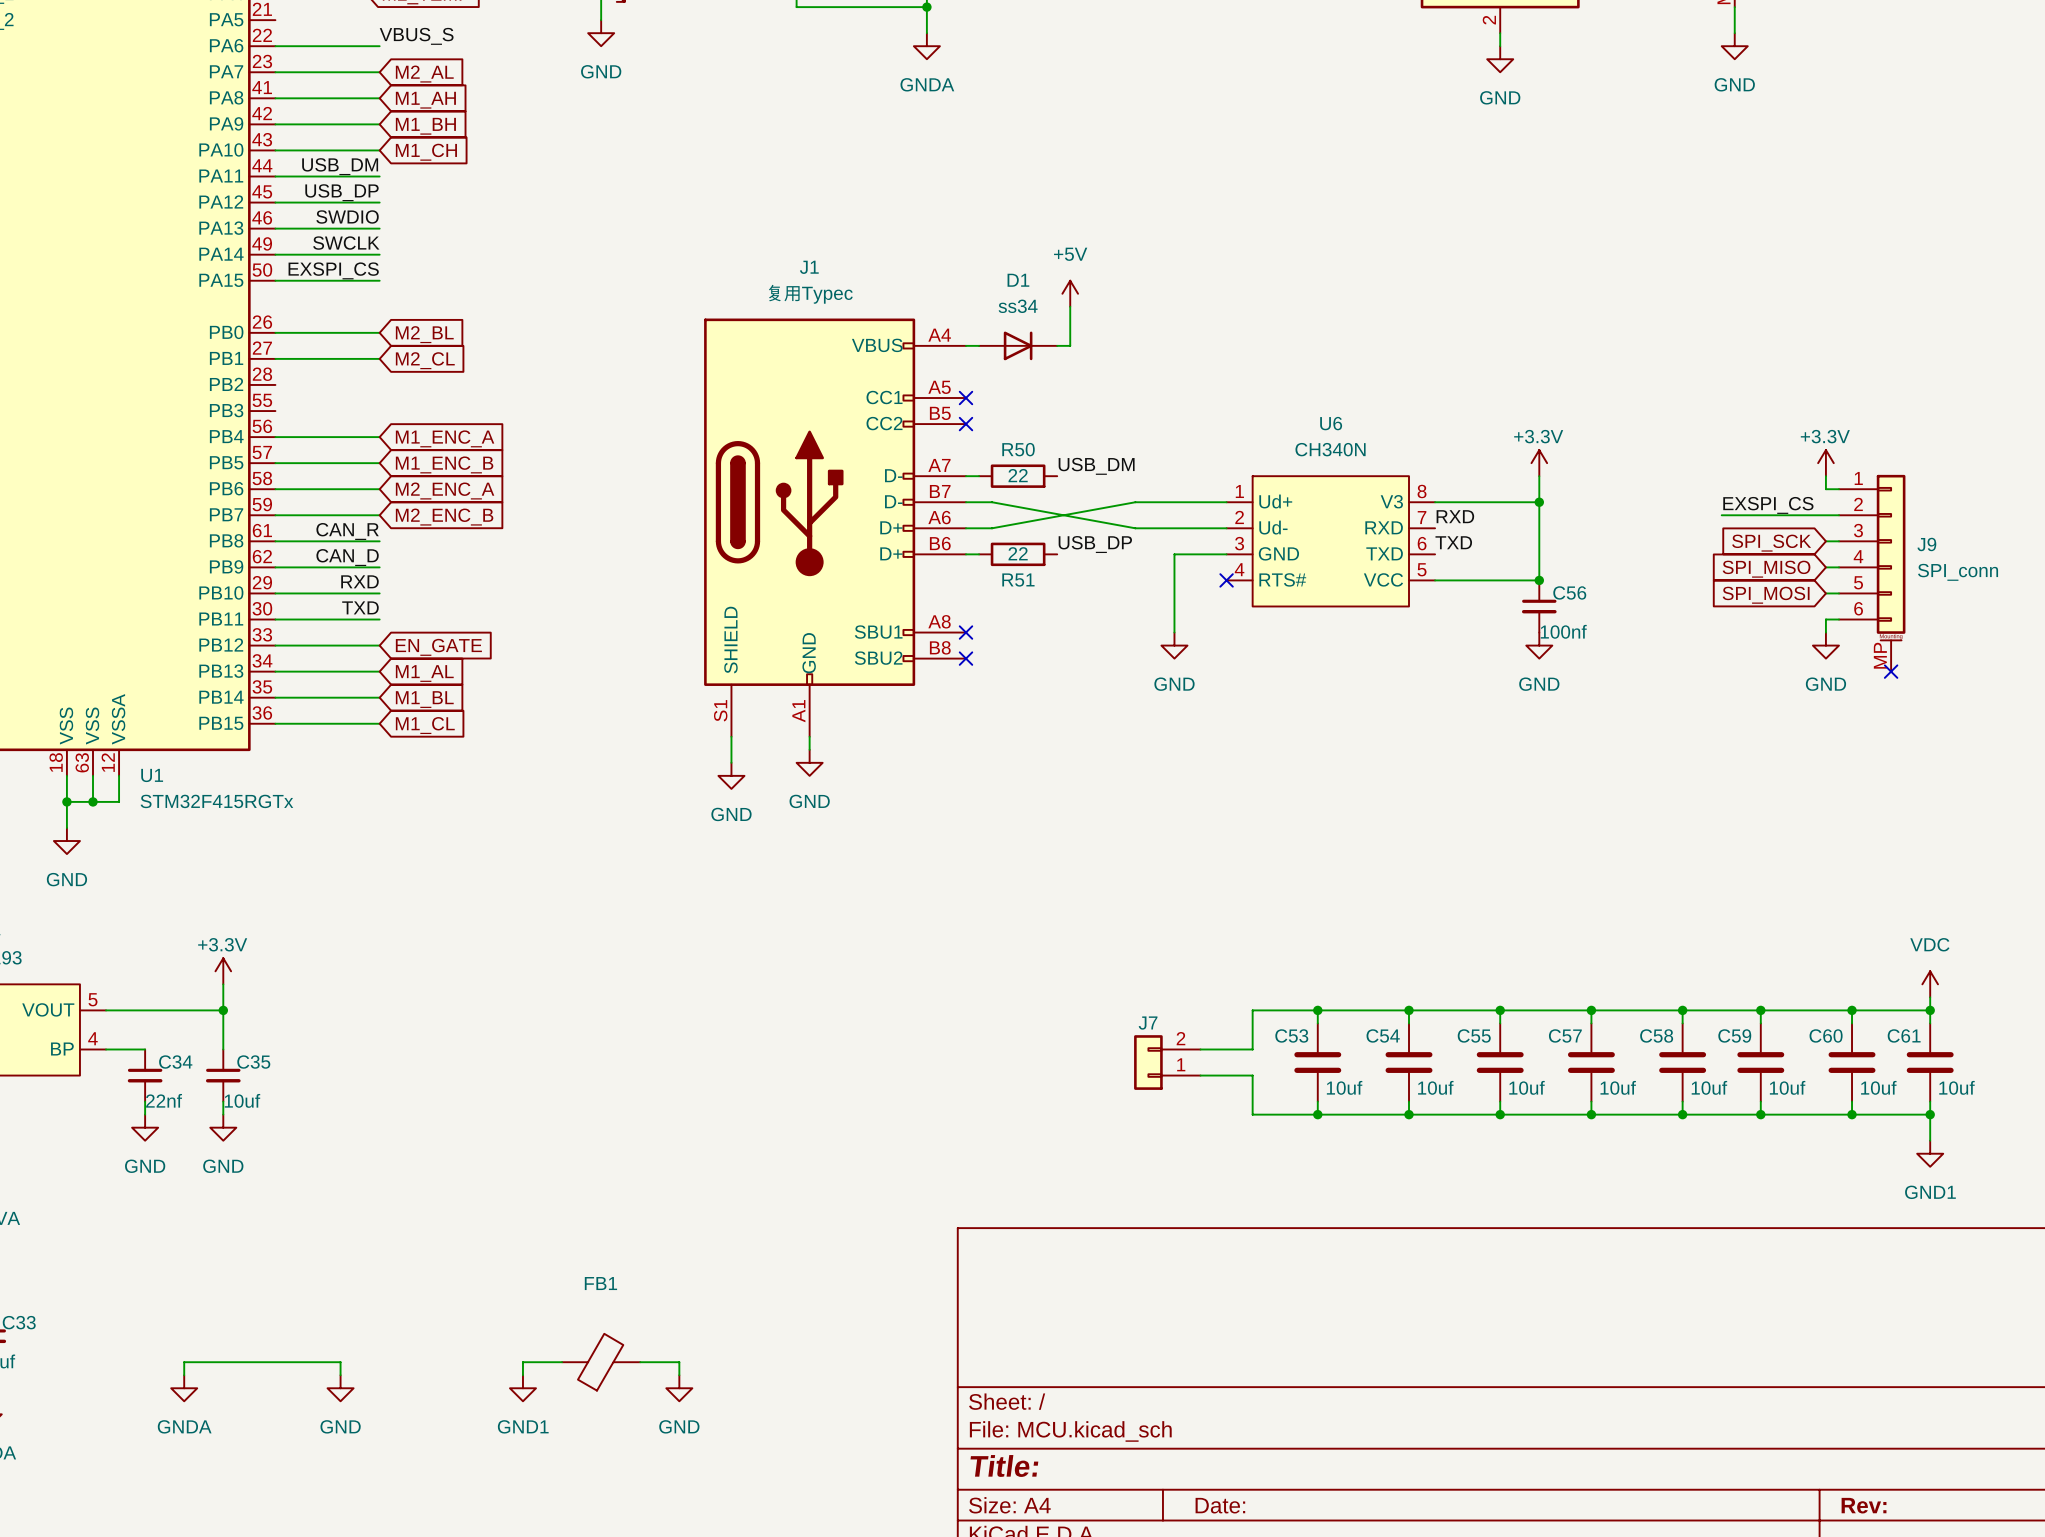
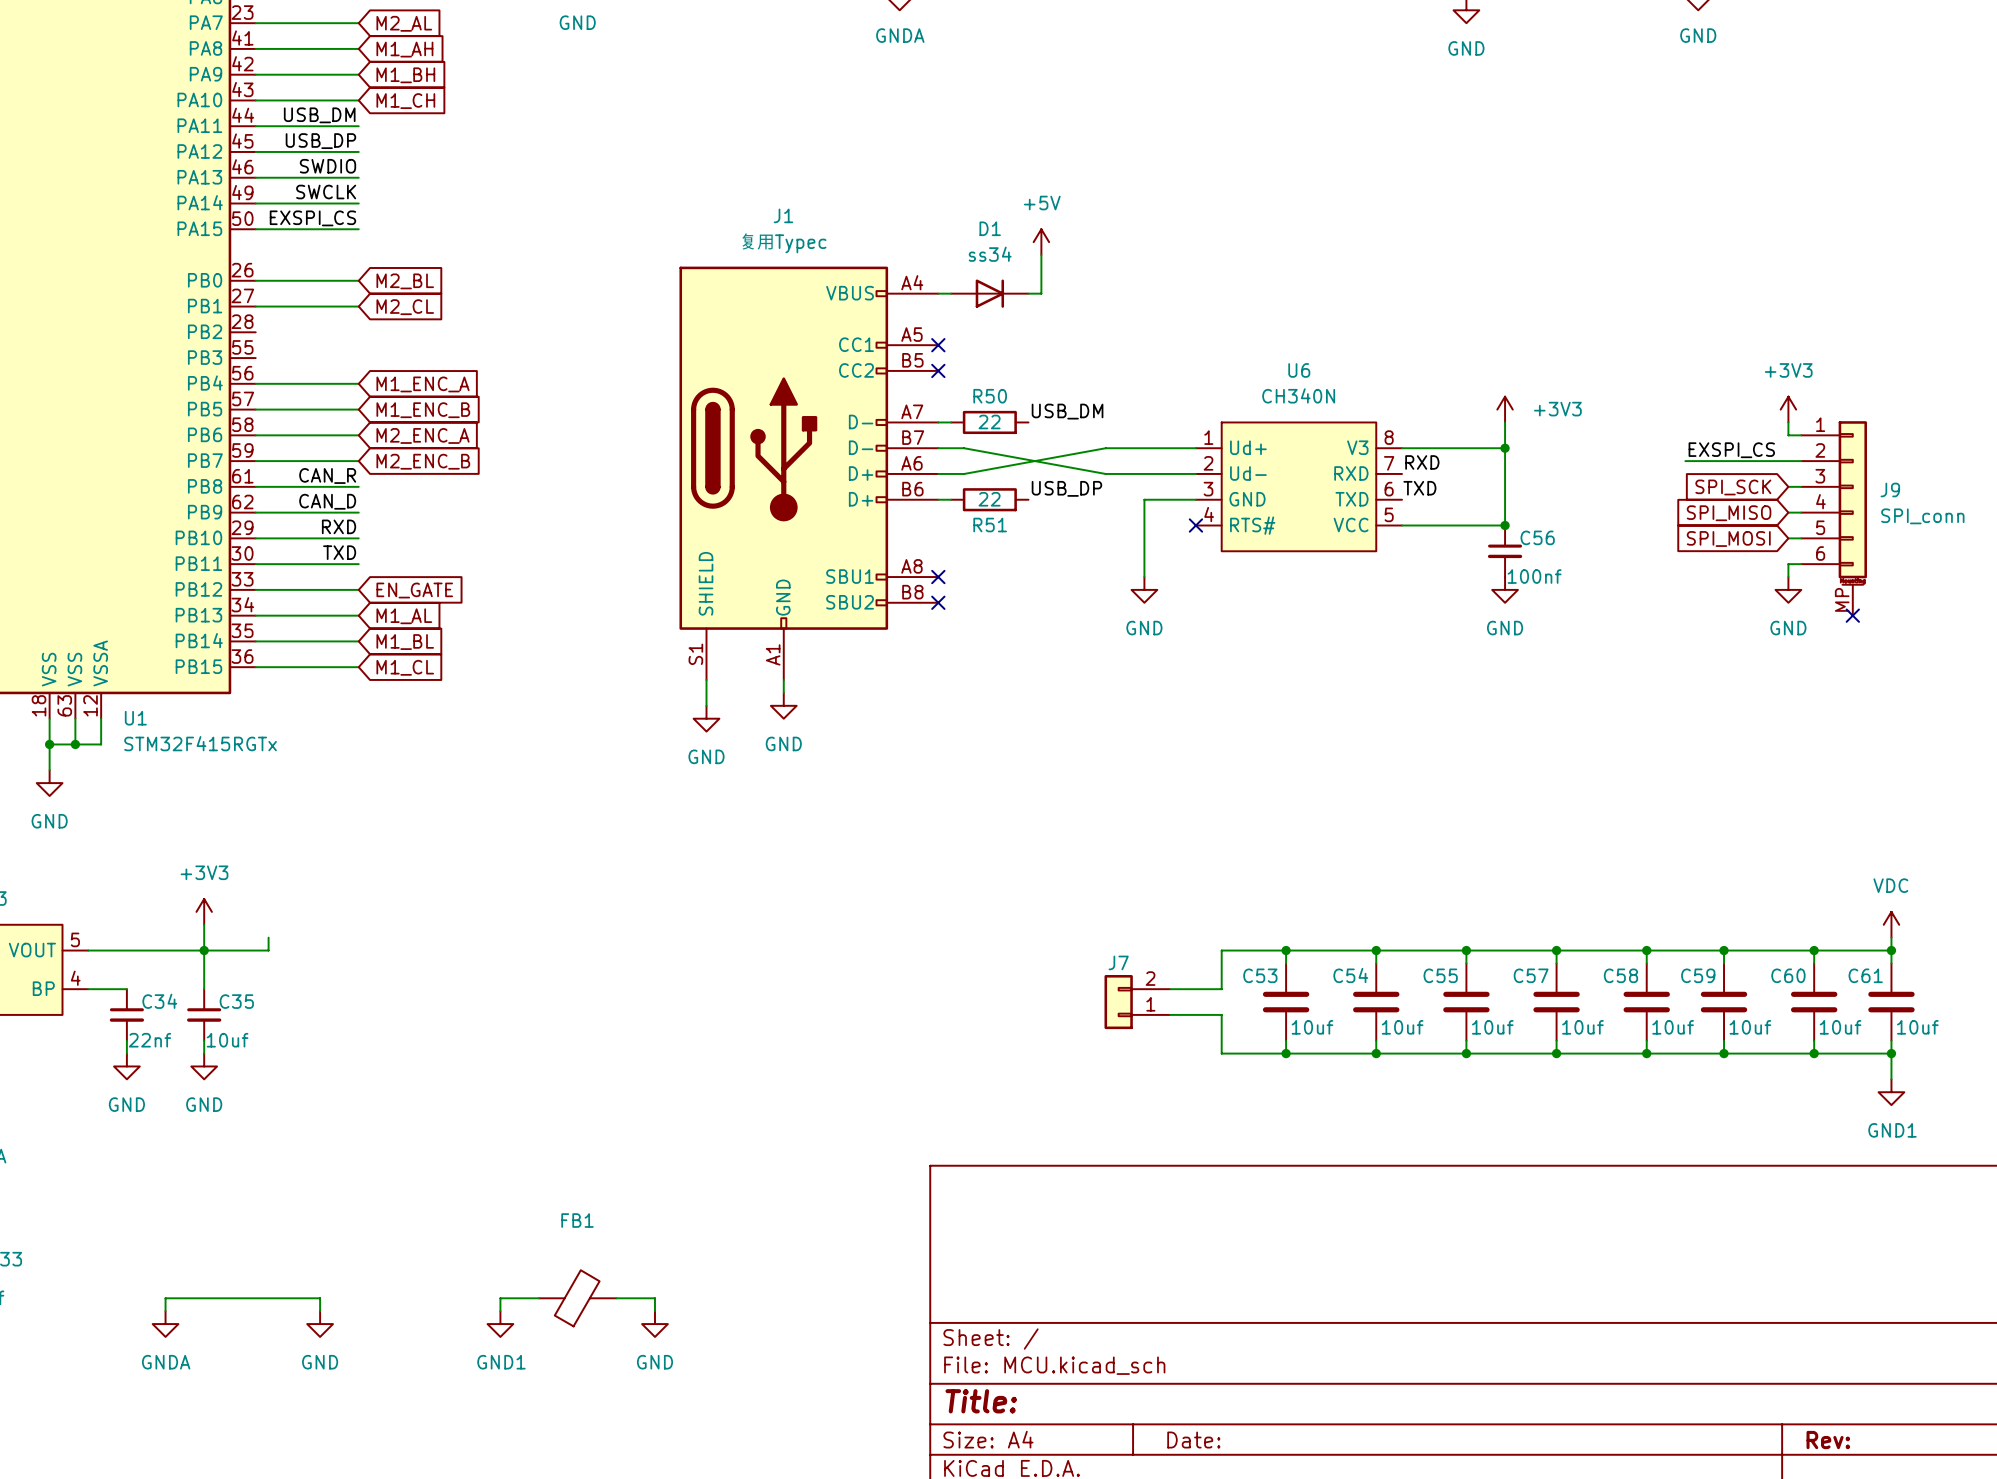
power symbol: +3.3V (1539, 463) -> +3V3 (1505, 409)
power symbol: +3.3V (1825, 463) -> +3V3 (1788, 409)
power symbol: +3.3V (223, 971) -> +3V3 (204, 911)
wire: none -> (268, 937) (268, 950) (204, 950)

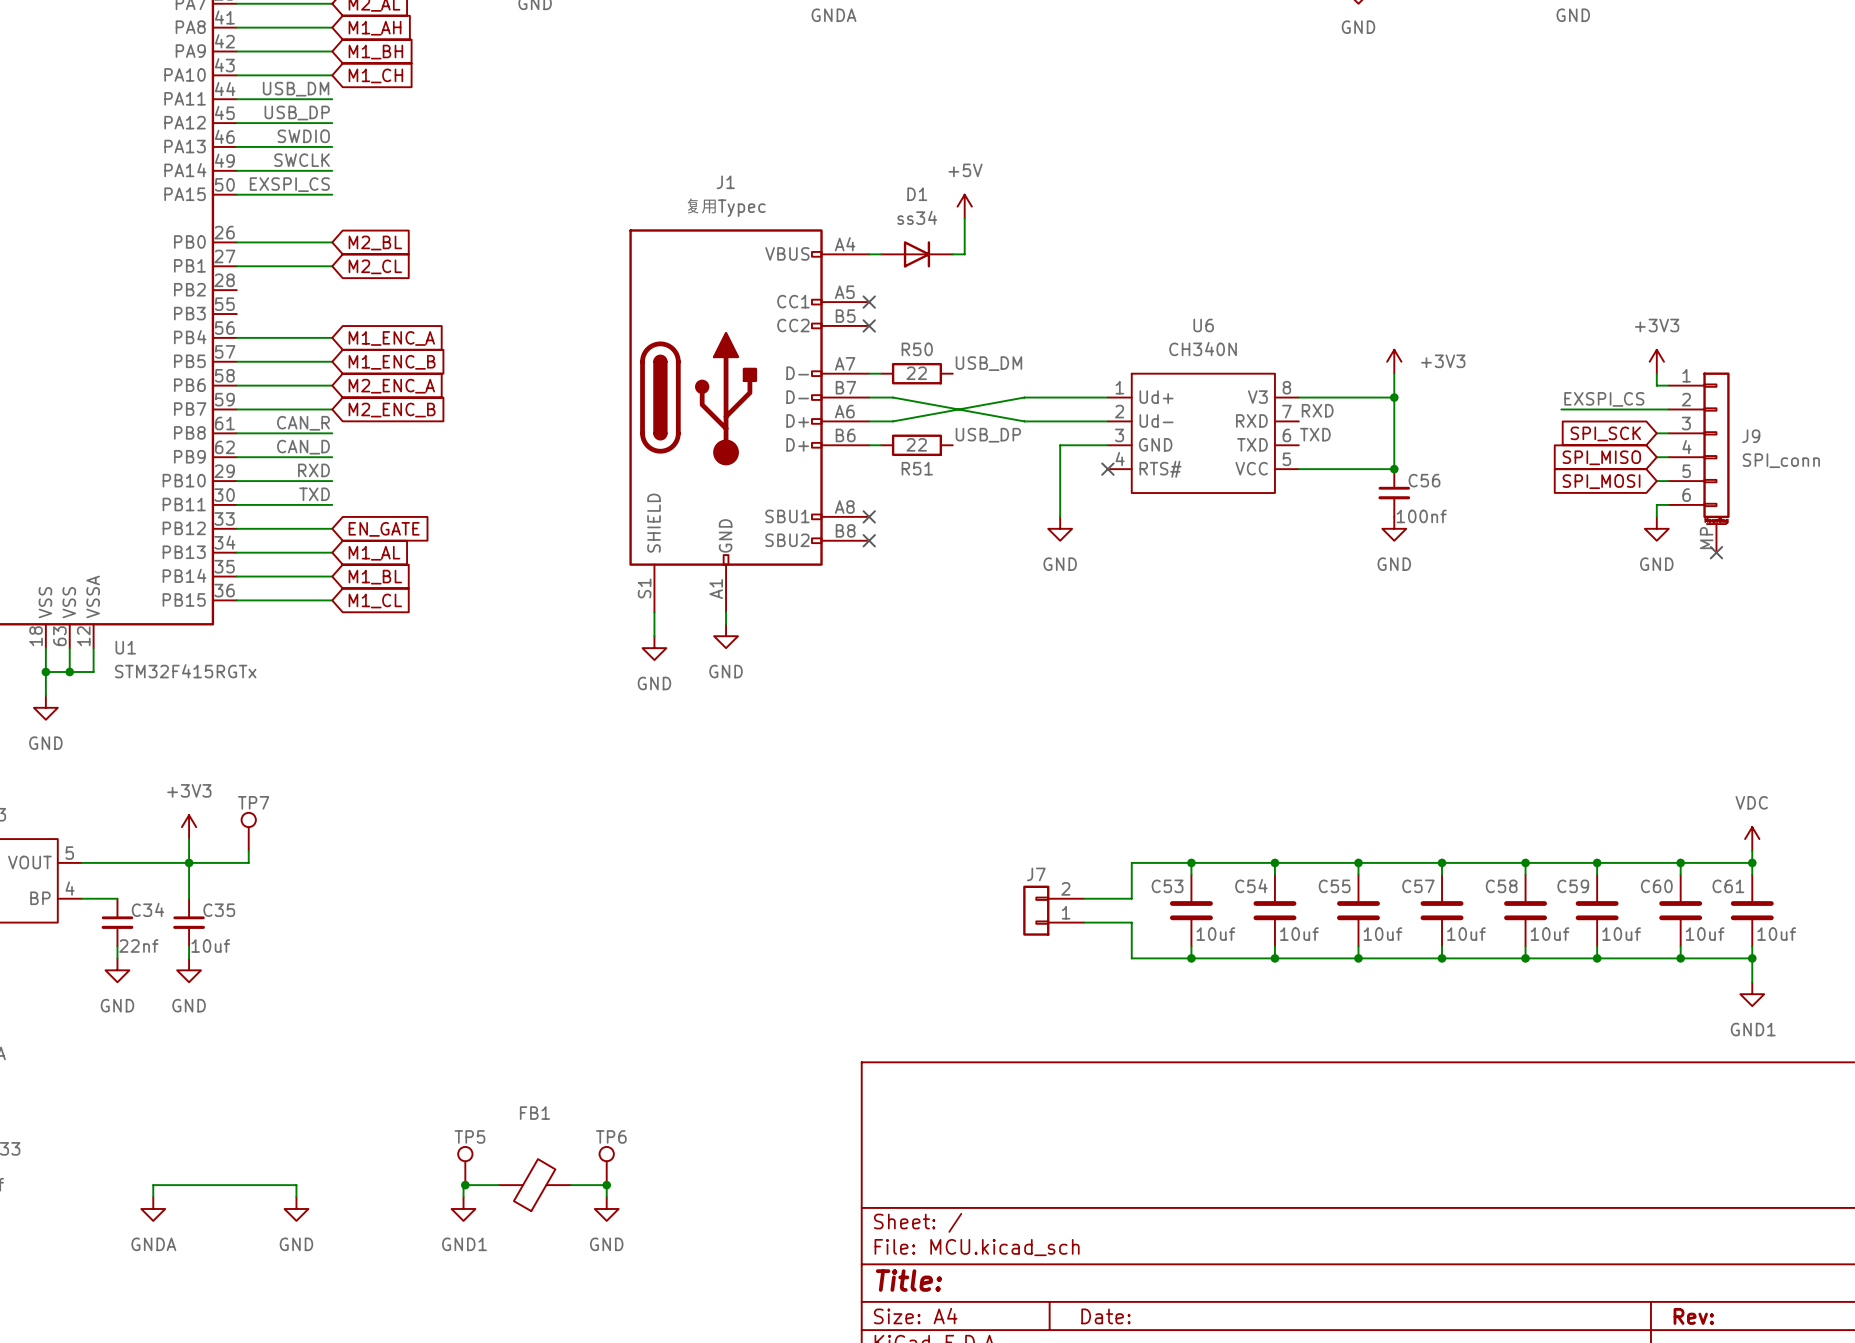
TP7: none -> (248, 831)
TP5: none -> (465, 1166)
TP6: none -> (606, 1166)
junction: none -> (465, 1185)
junction: none -> (606, 1185)

